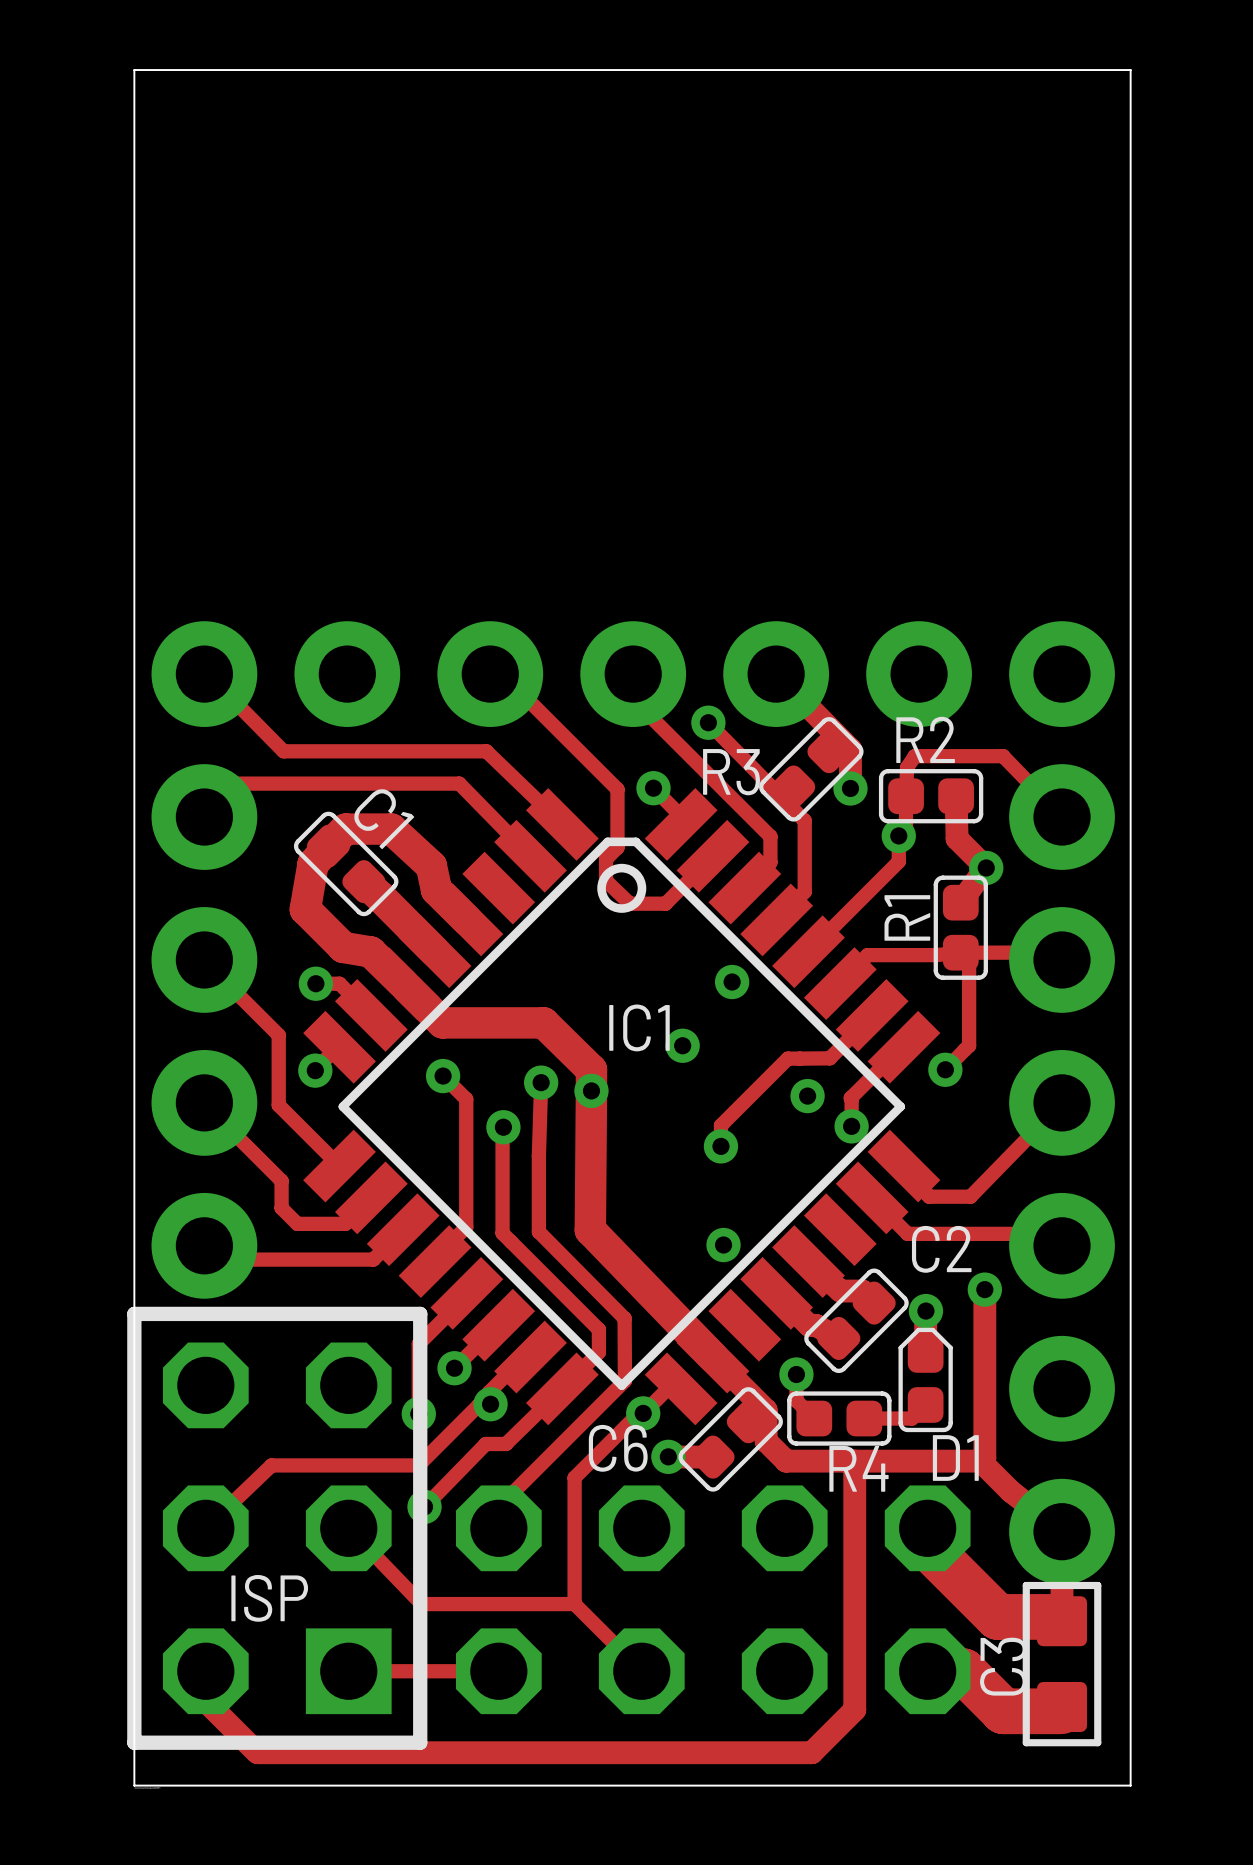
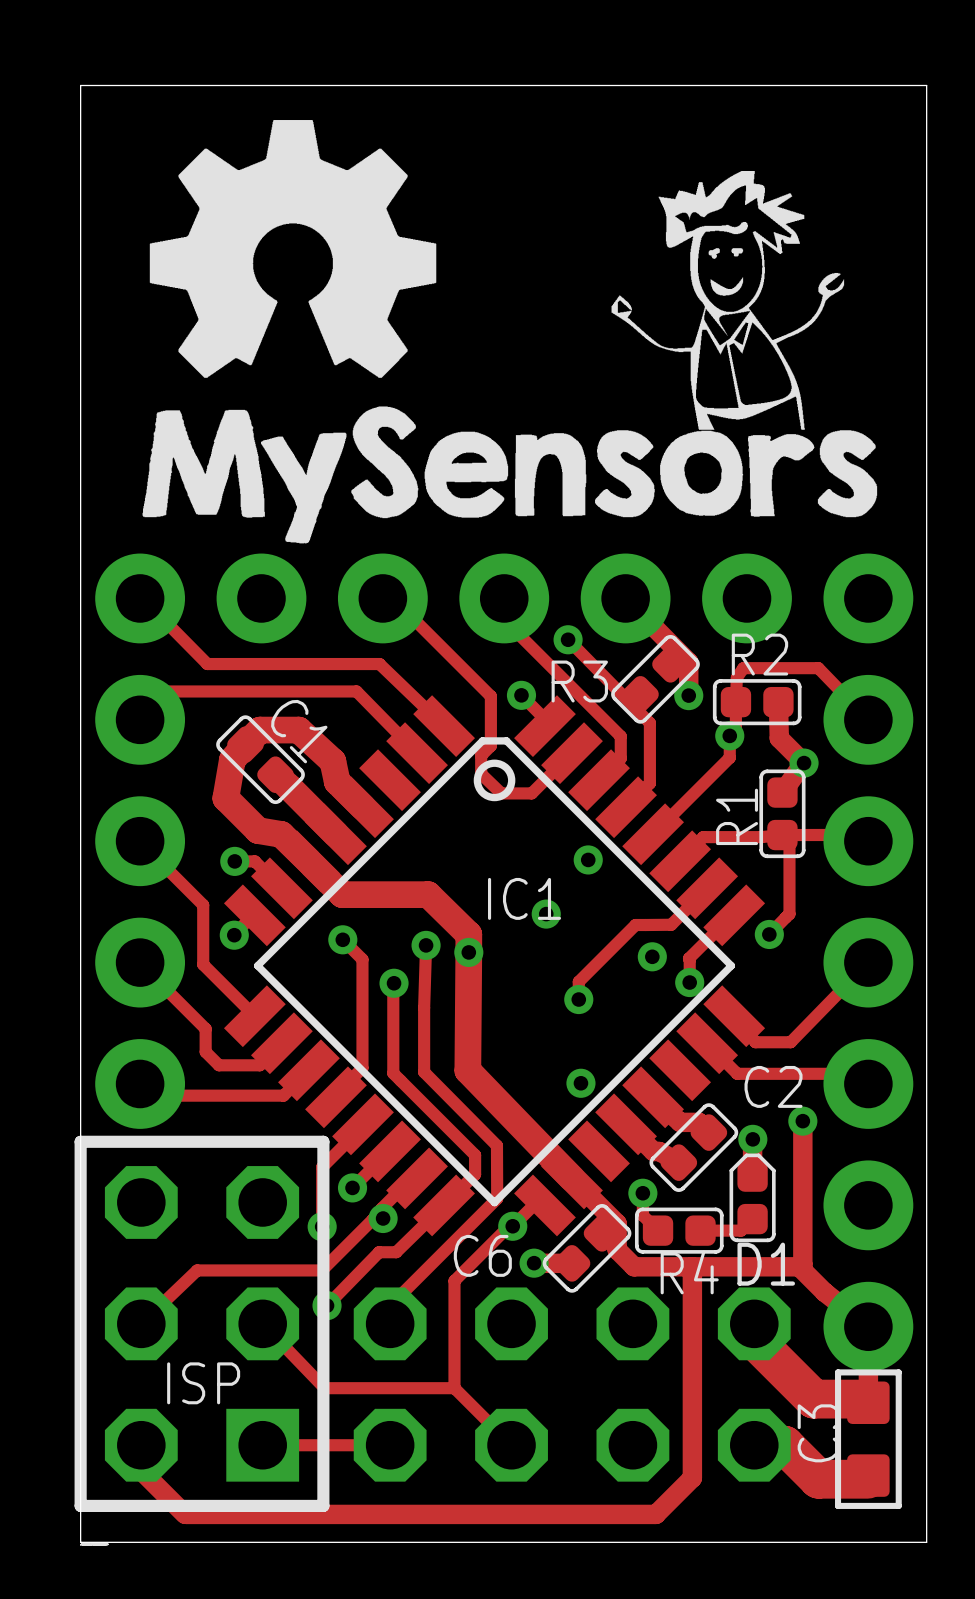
drawing: none -> [142, 120, 878, 544]

